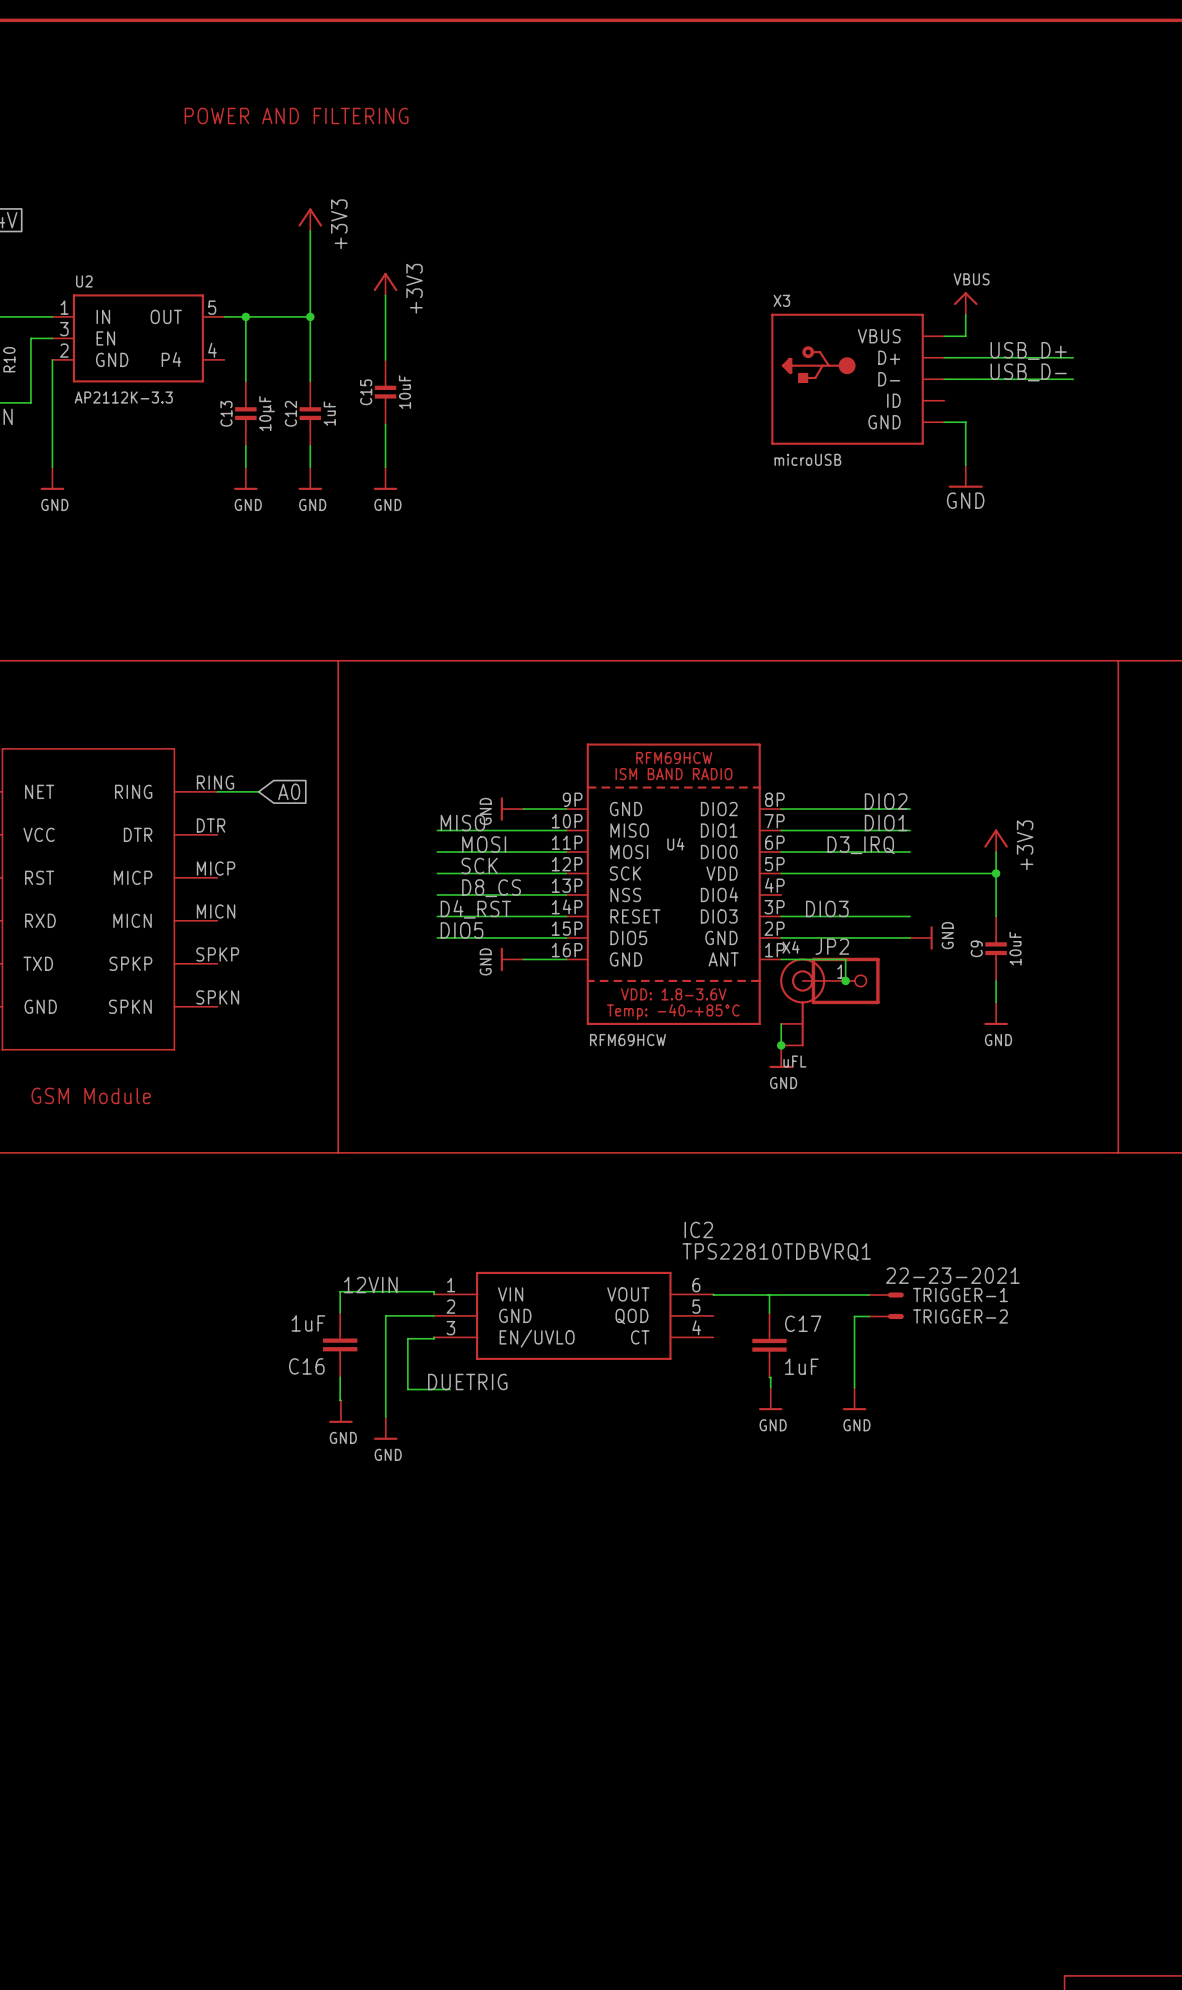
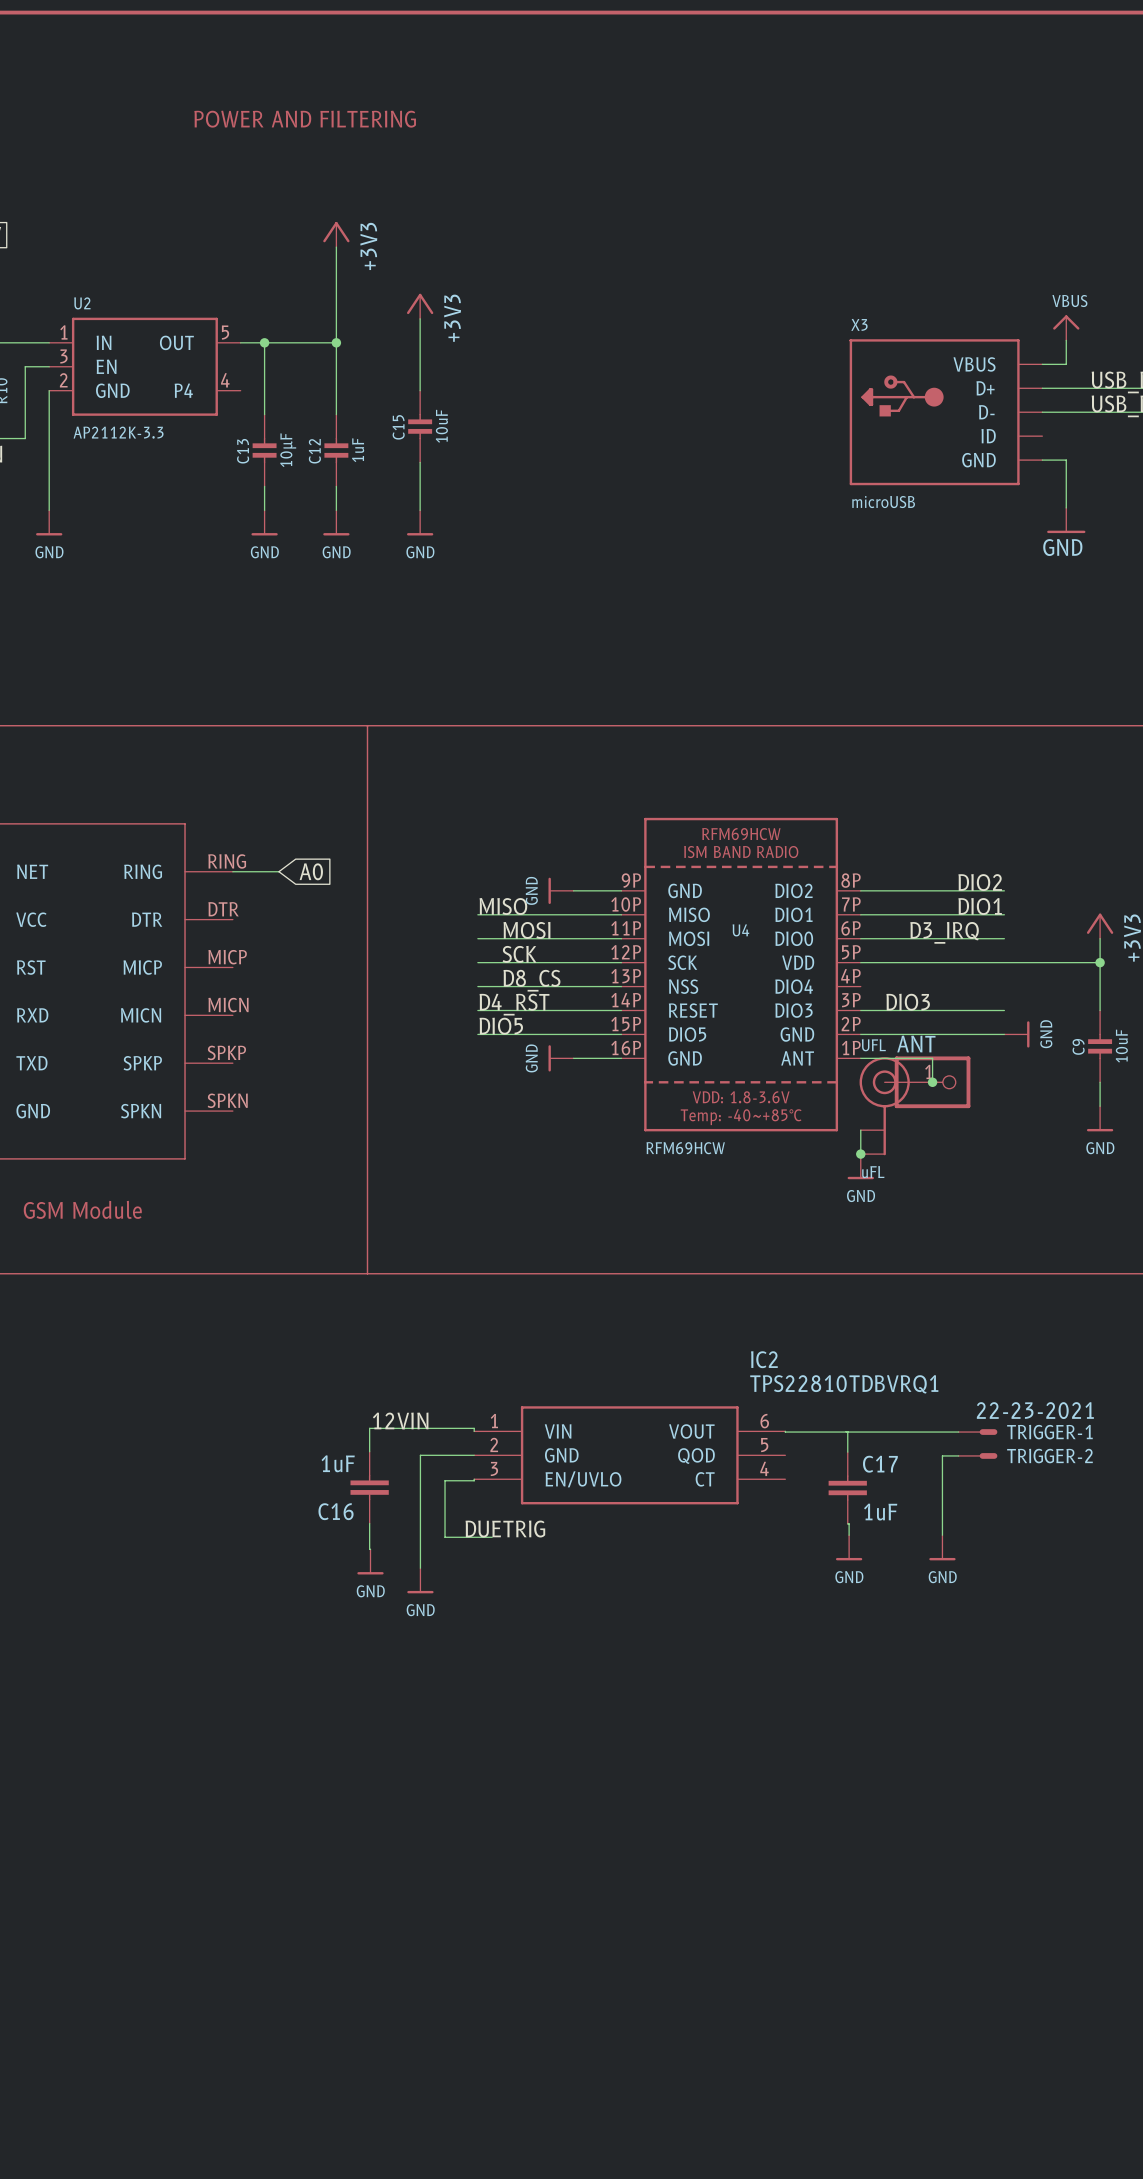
JP2 name: JP2 (832, 946) -> ANT (916, 1044)
X4 name: X4 (790, 947) -> UFL (873, 1045)

